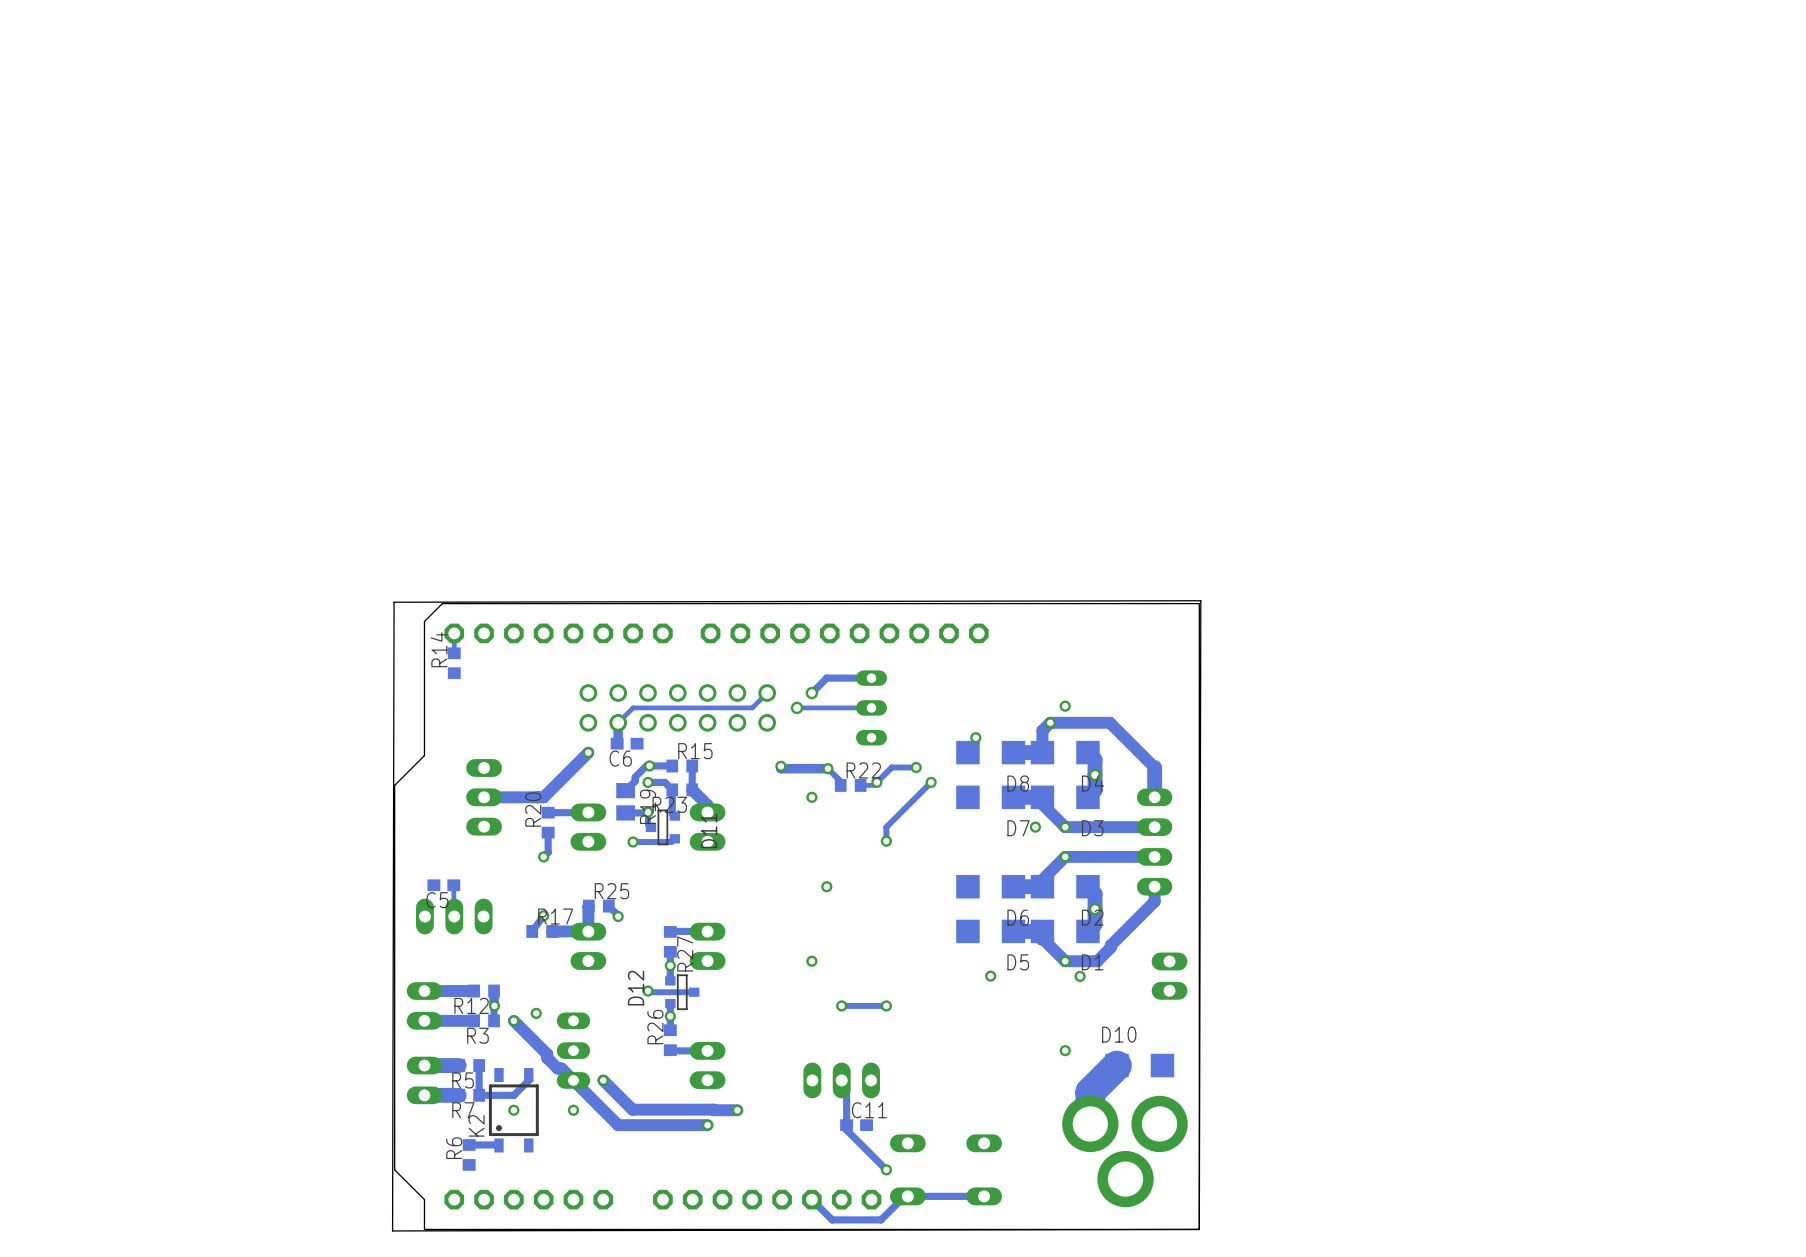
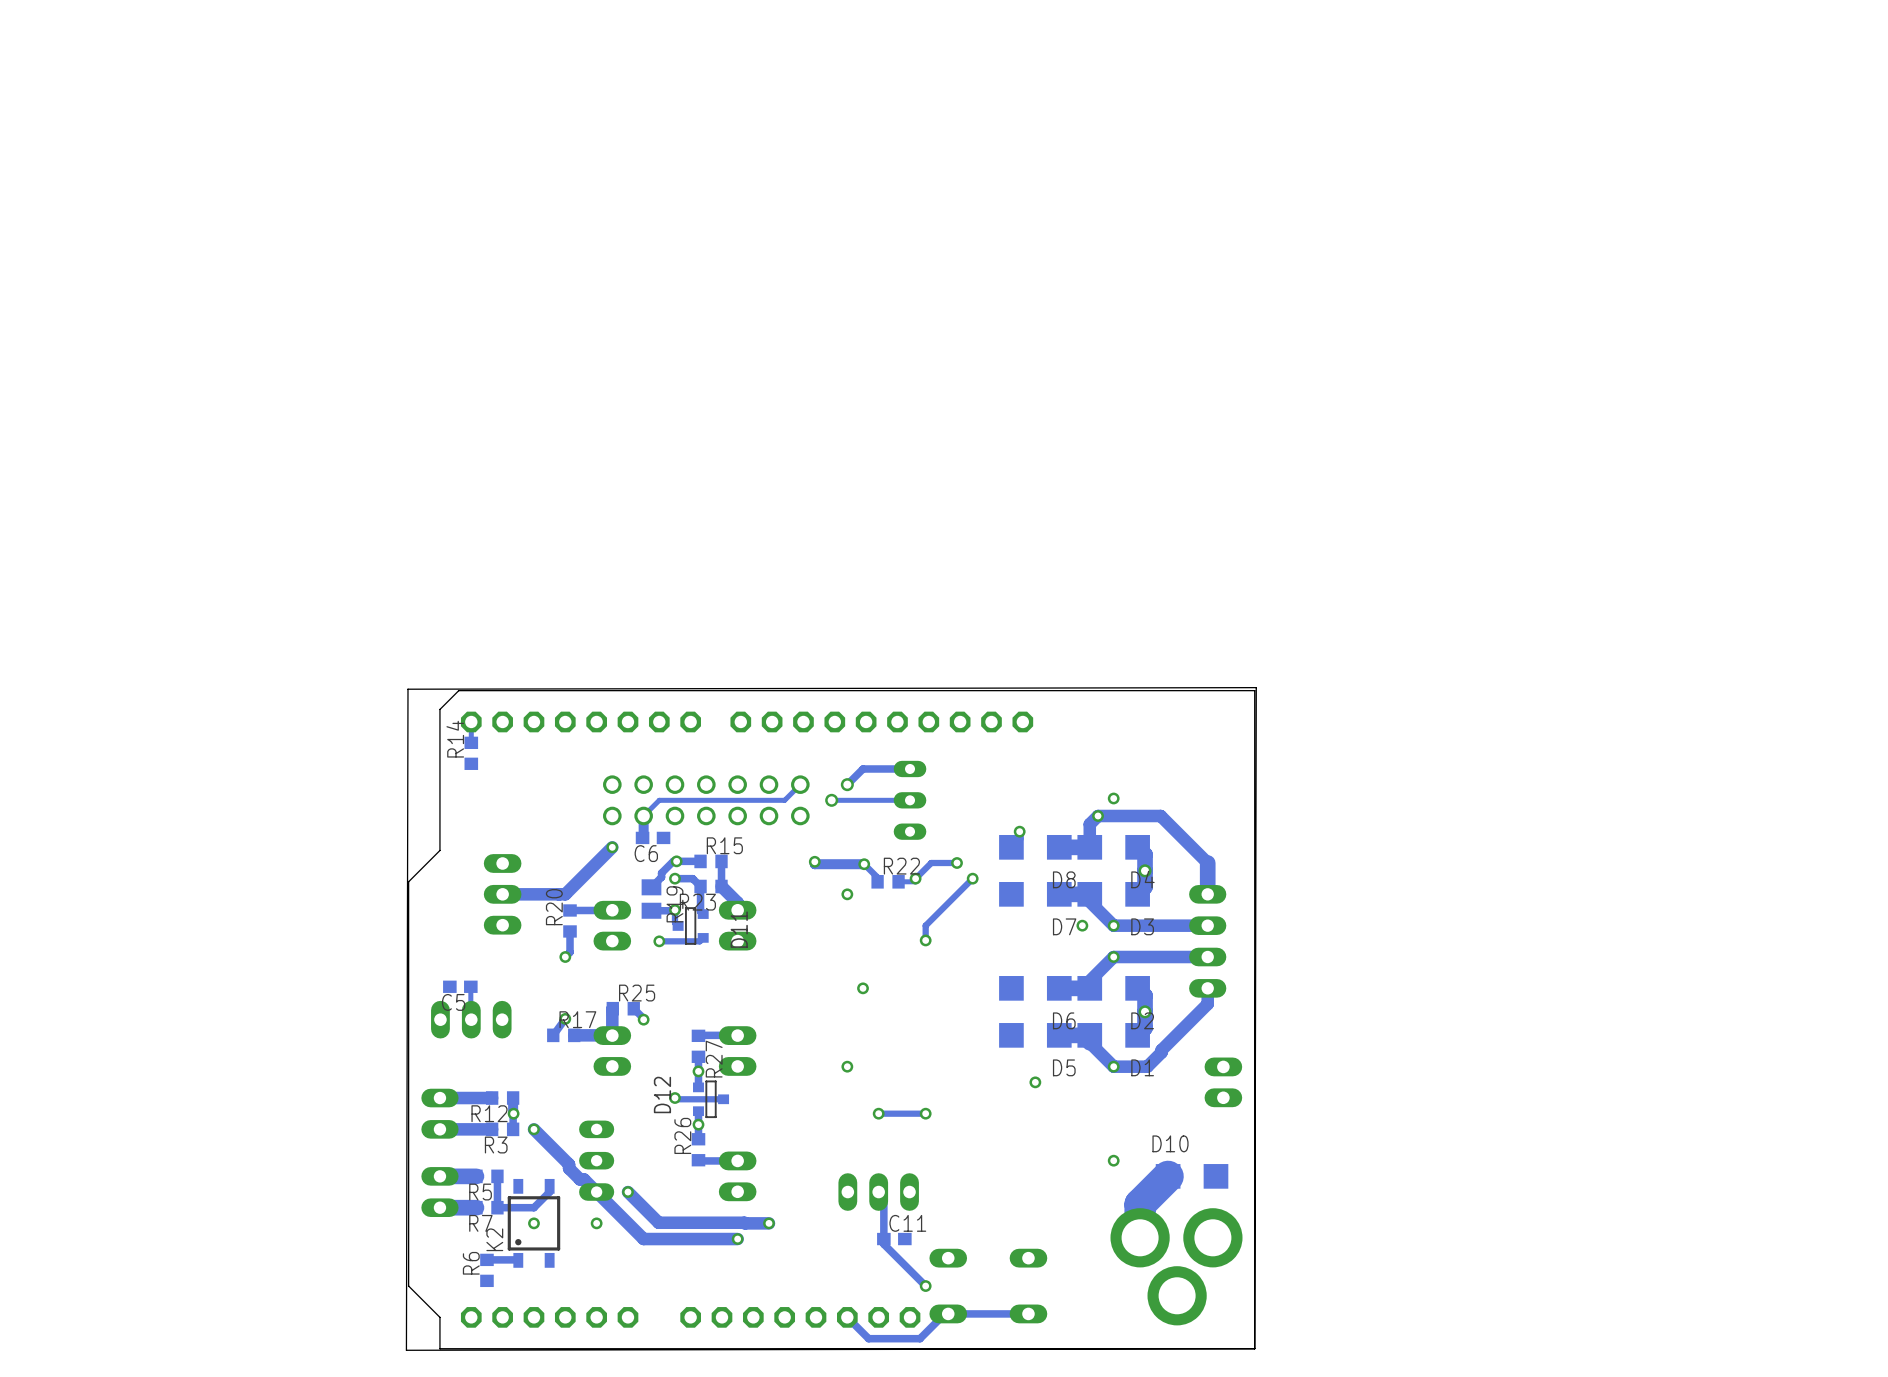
via: (1080, 976) -> none
via: (536, 1013) -> none

